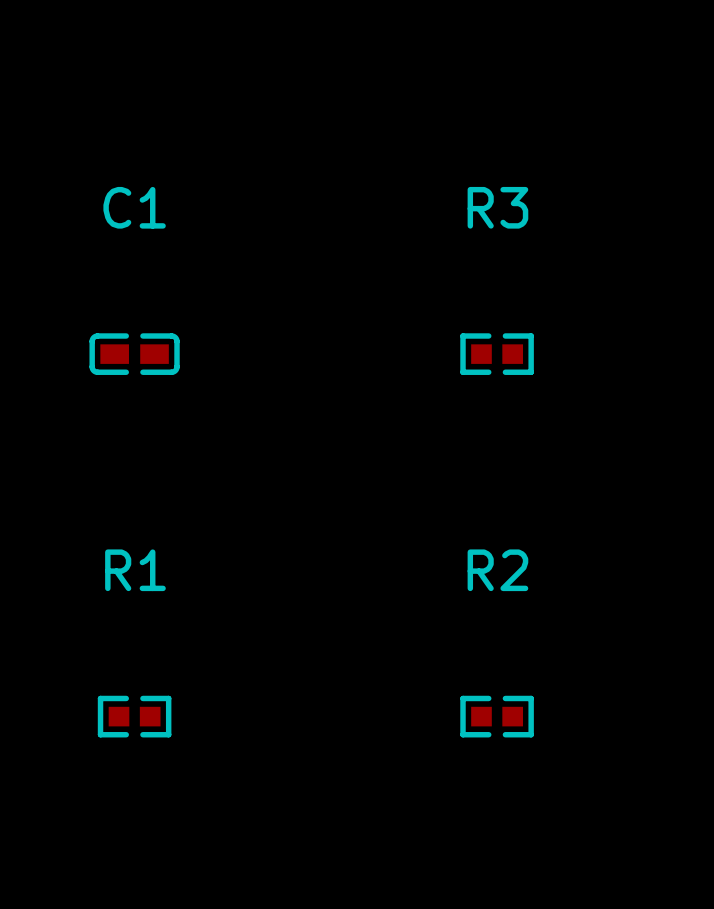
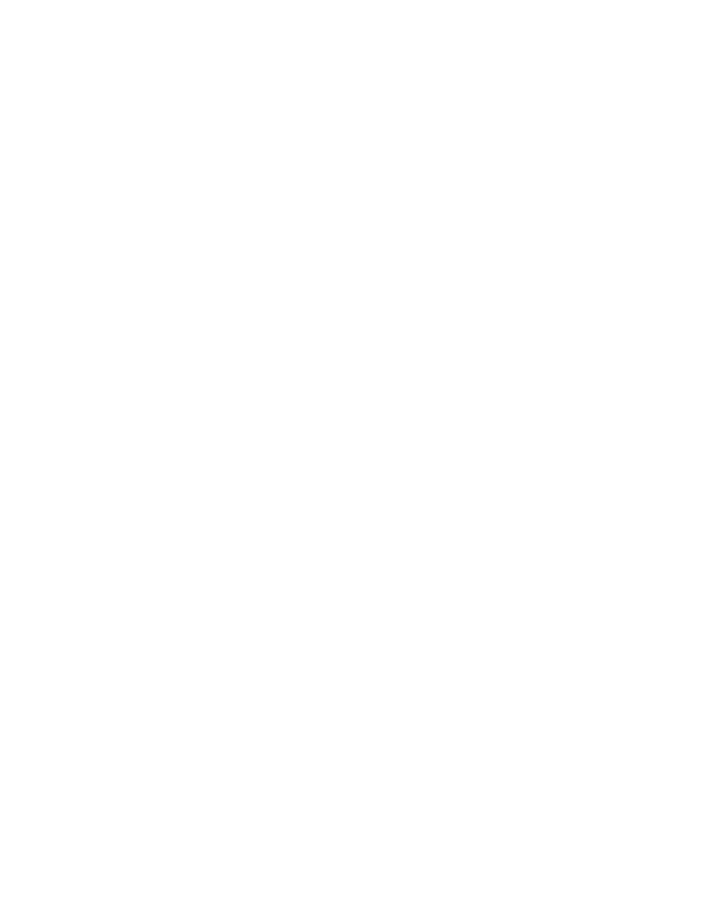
C1: (134, 354) -> none
R3: (497, 354) -> none
R1: (134, 716) -> none
R2: (497, 716) -> none

